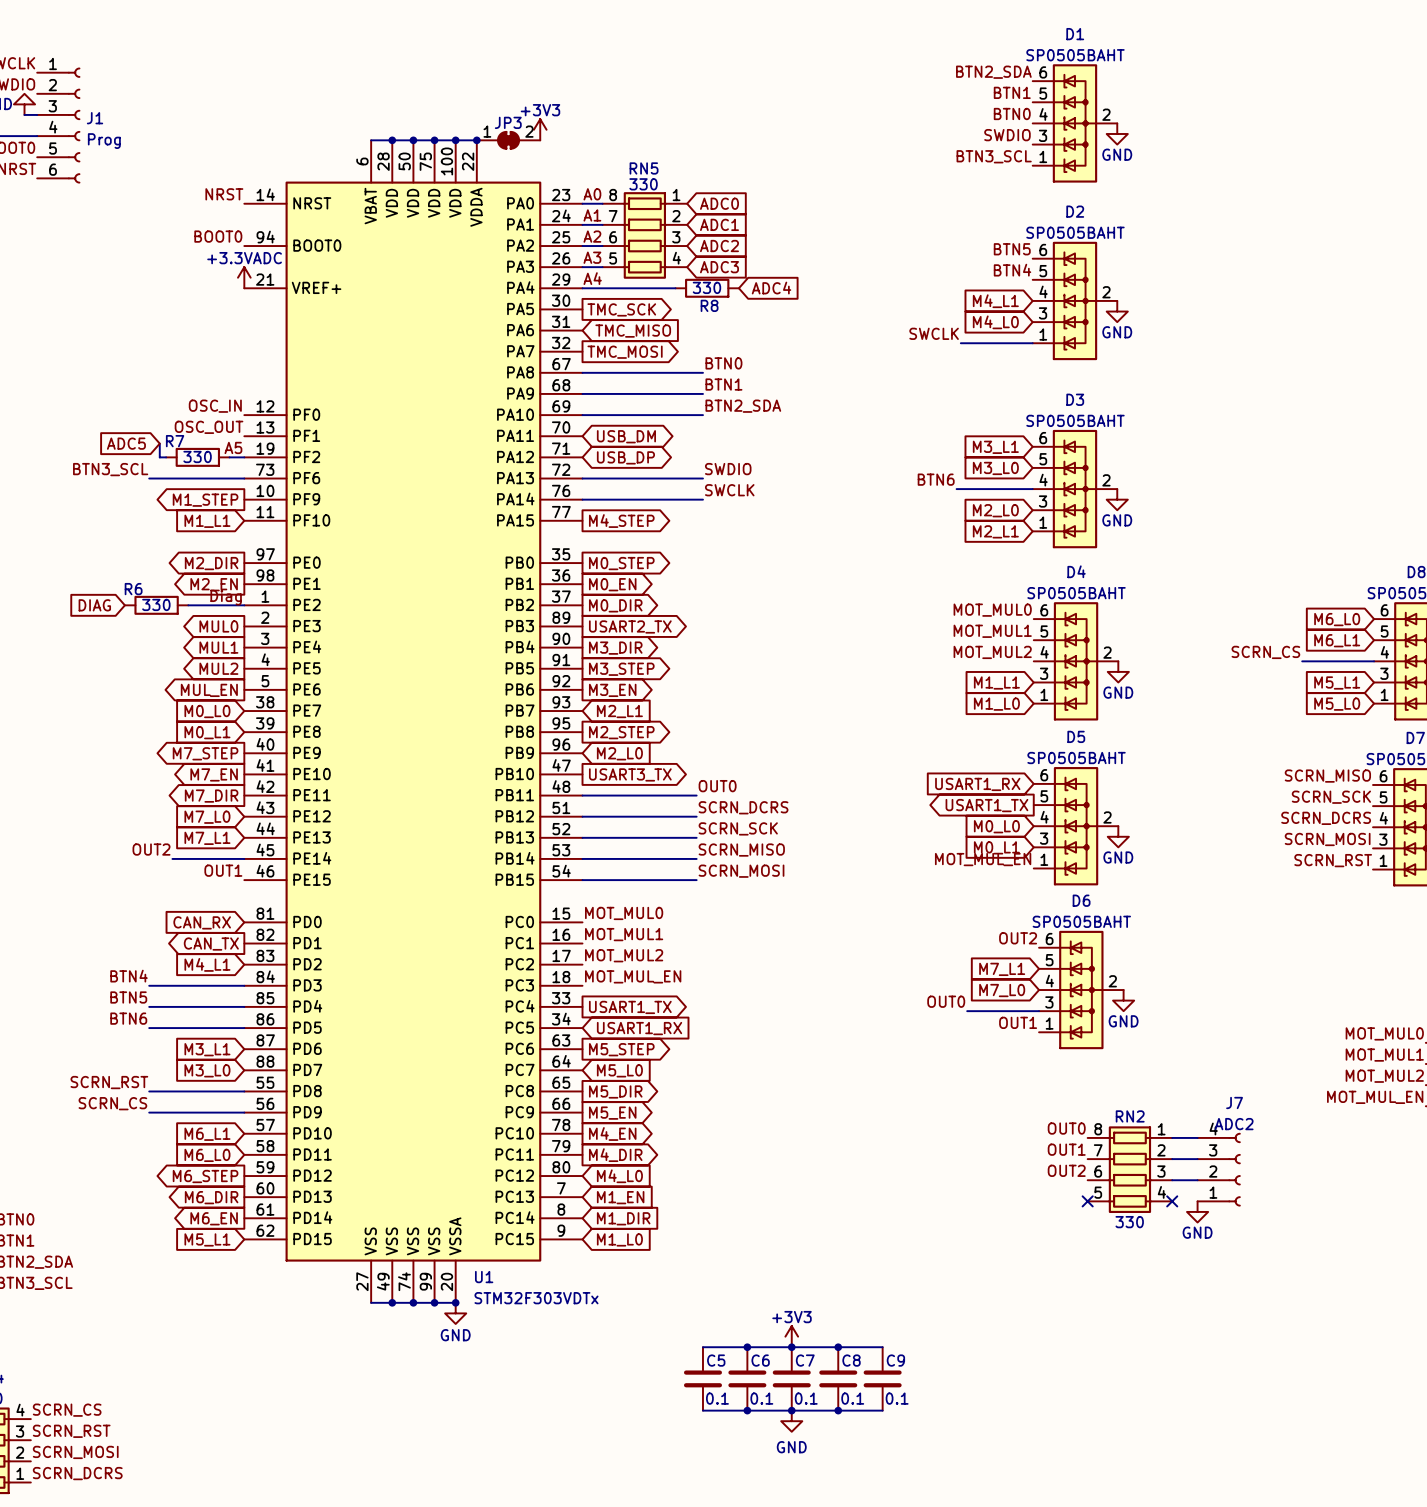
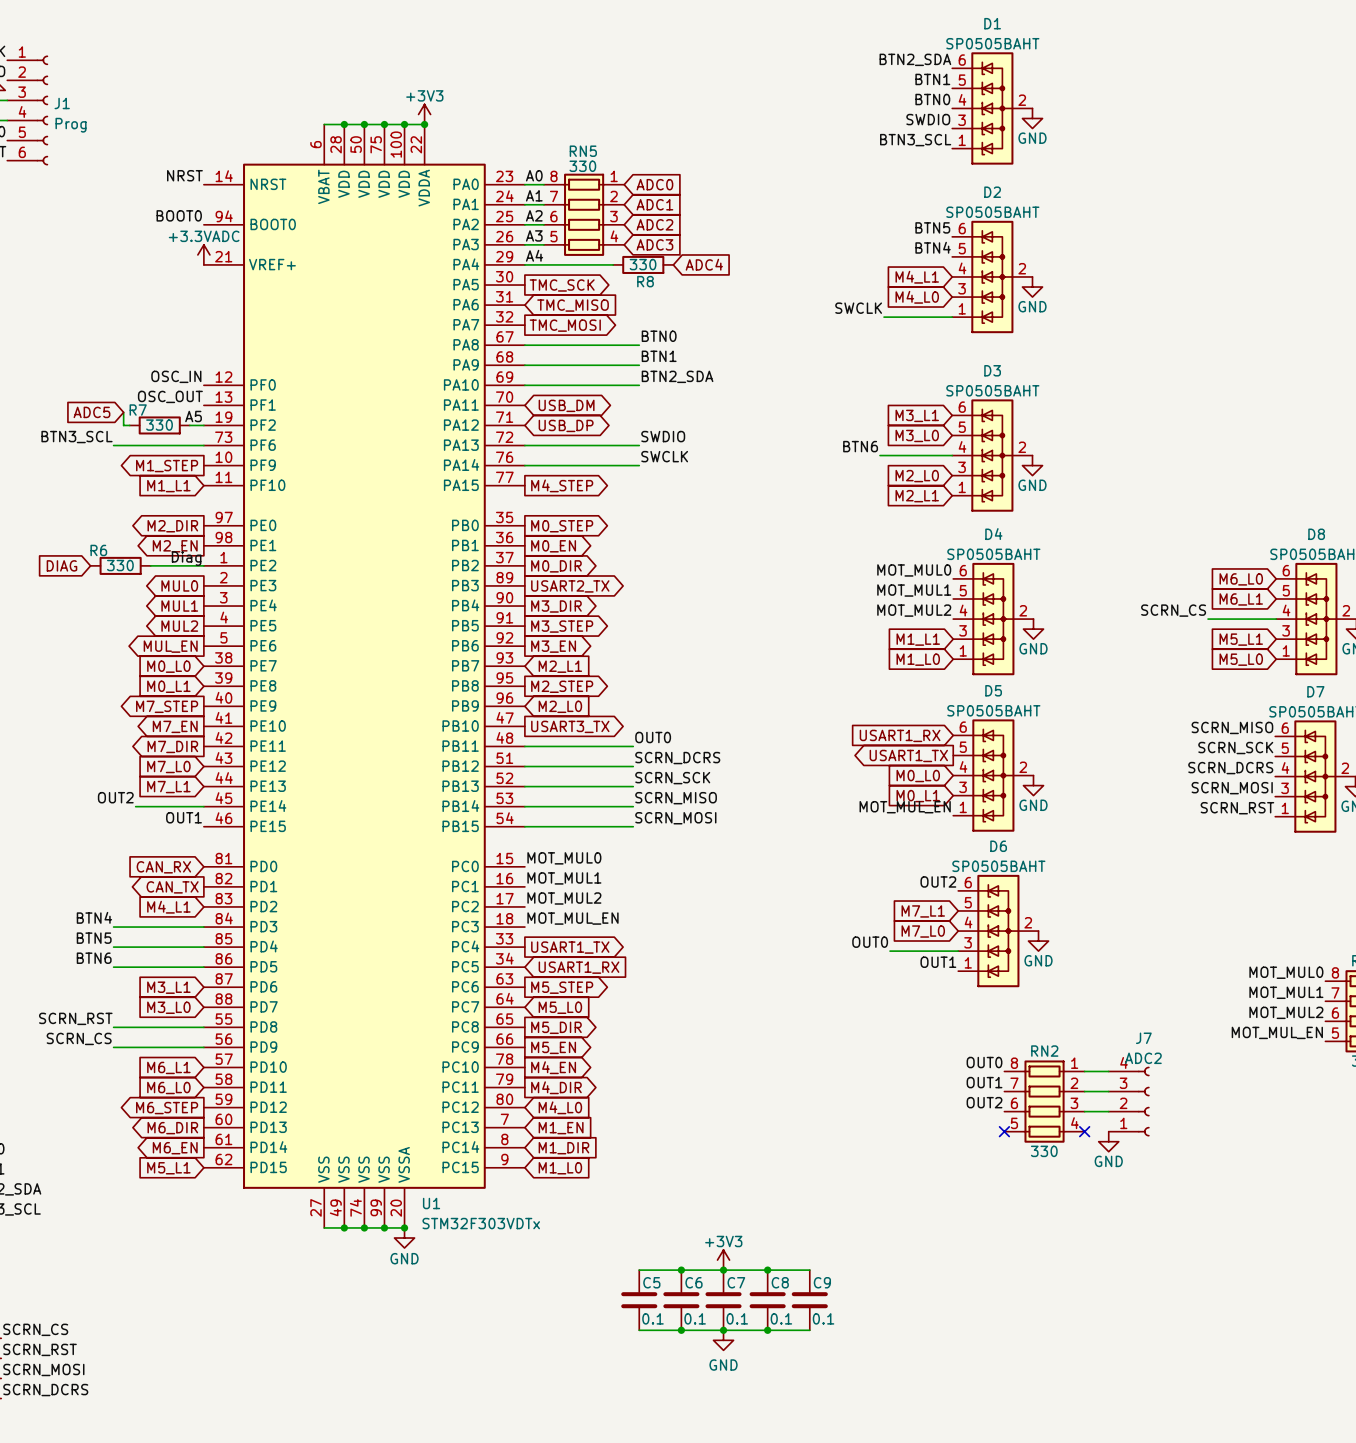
power symbol position: +3V3 (540, 129) -> +3V3 (424, 114)
JP3: (508, 140) -> none

